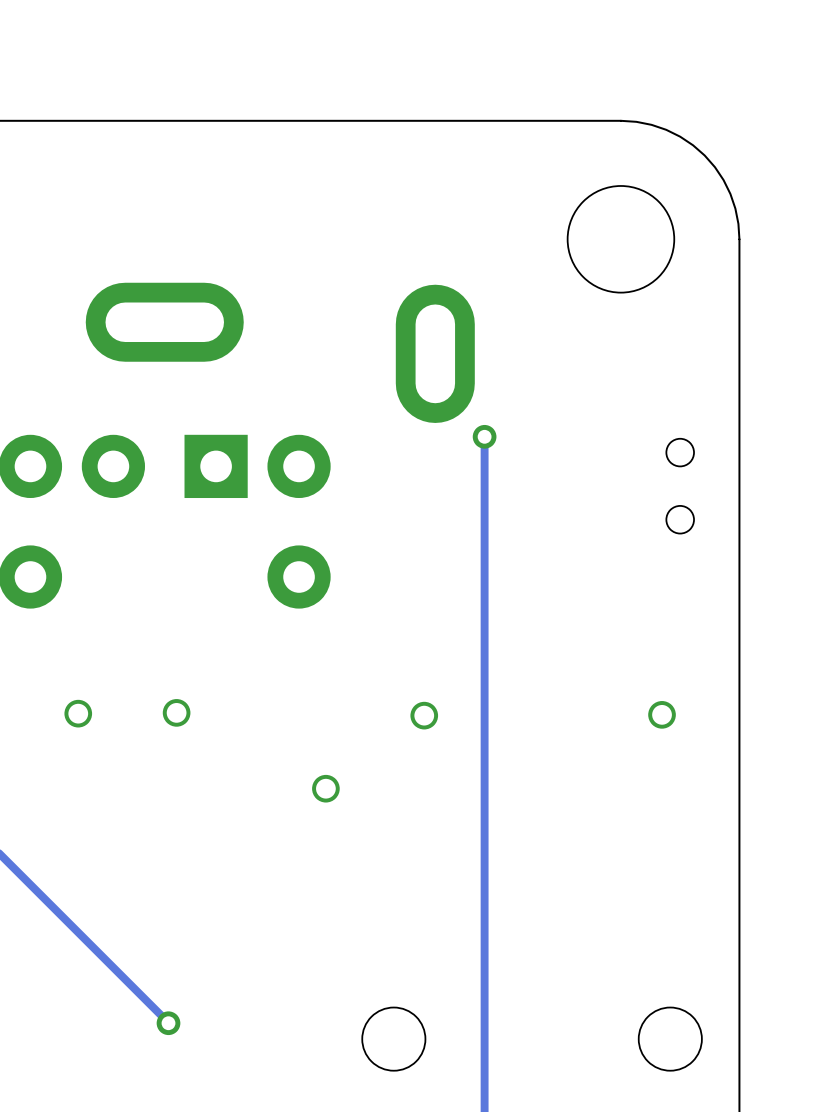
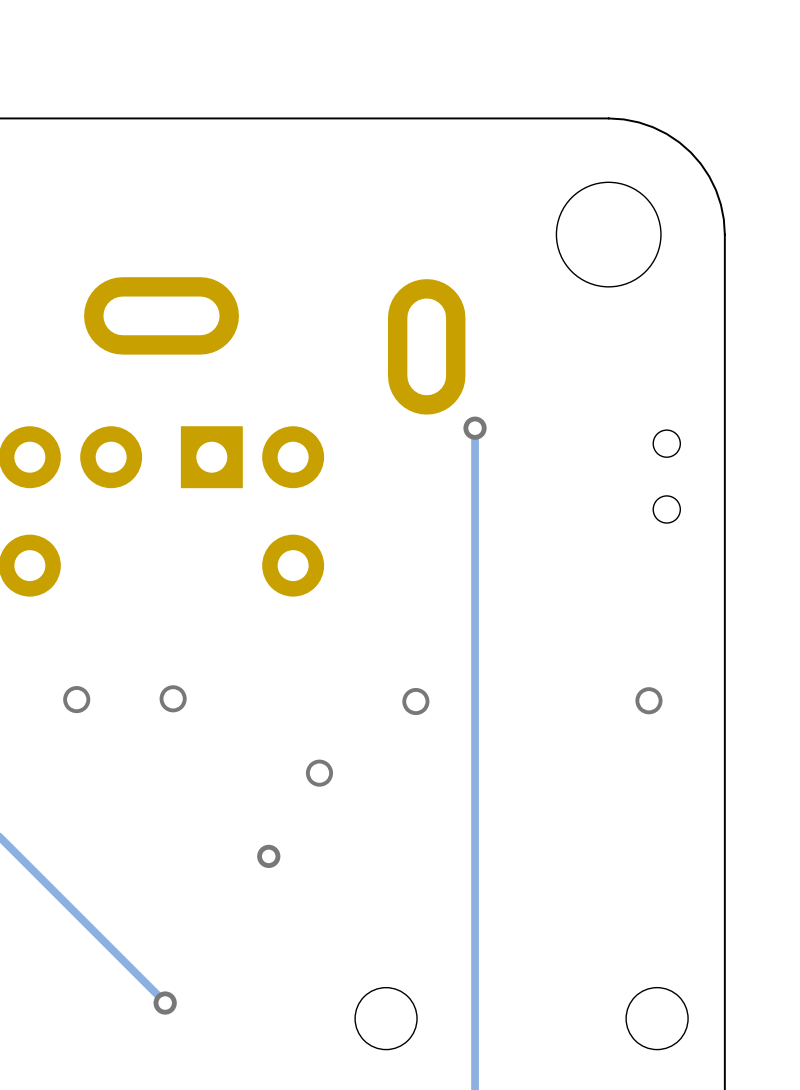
via: none -> (268, 856)

